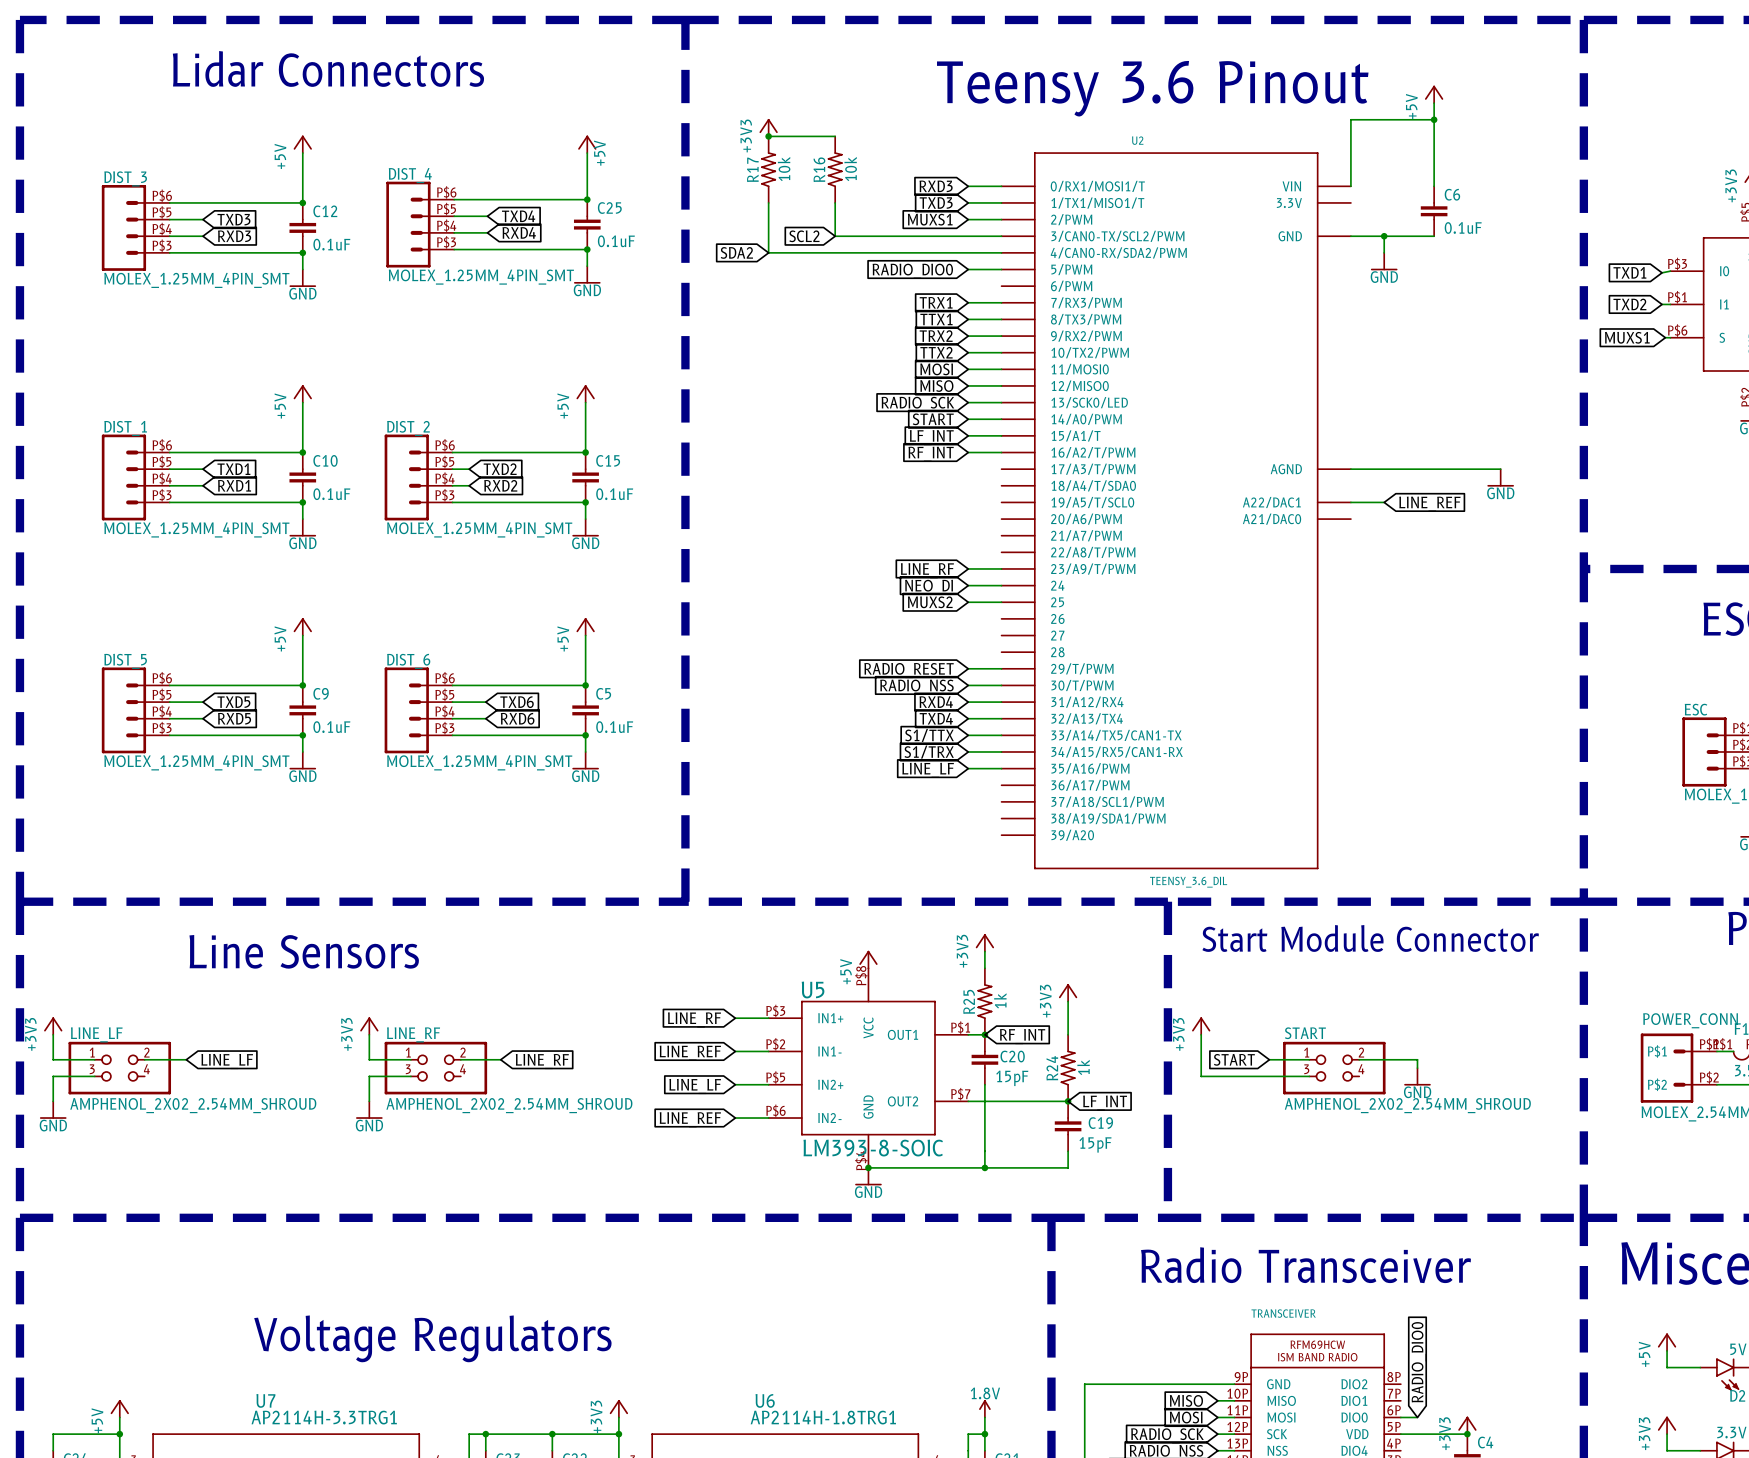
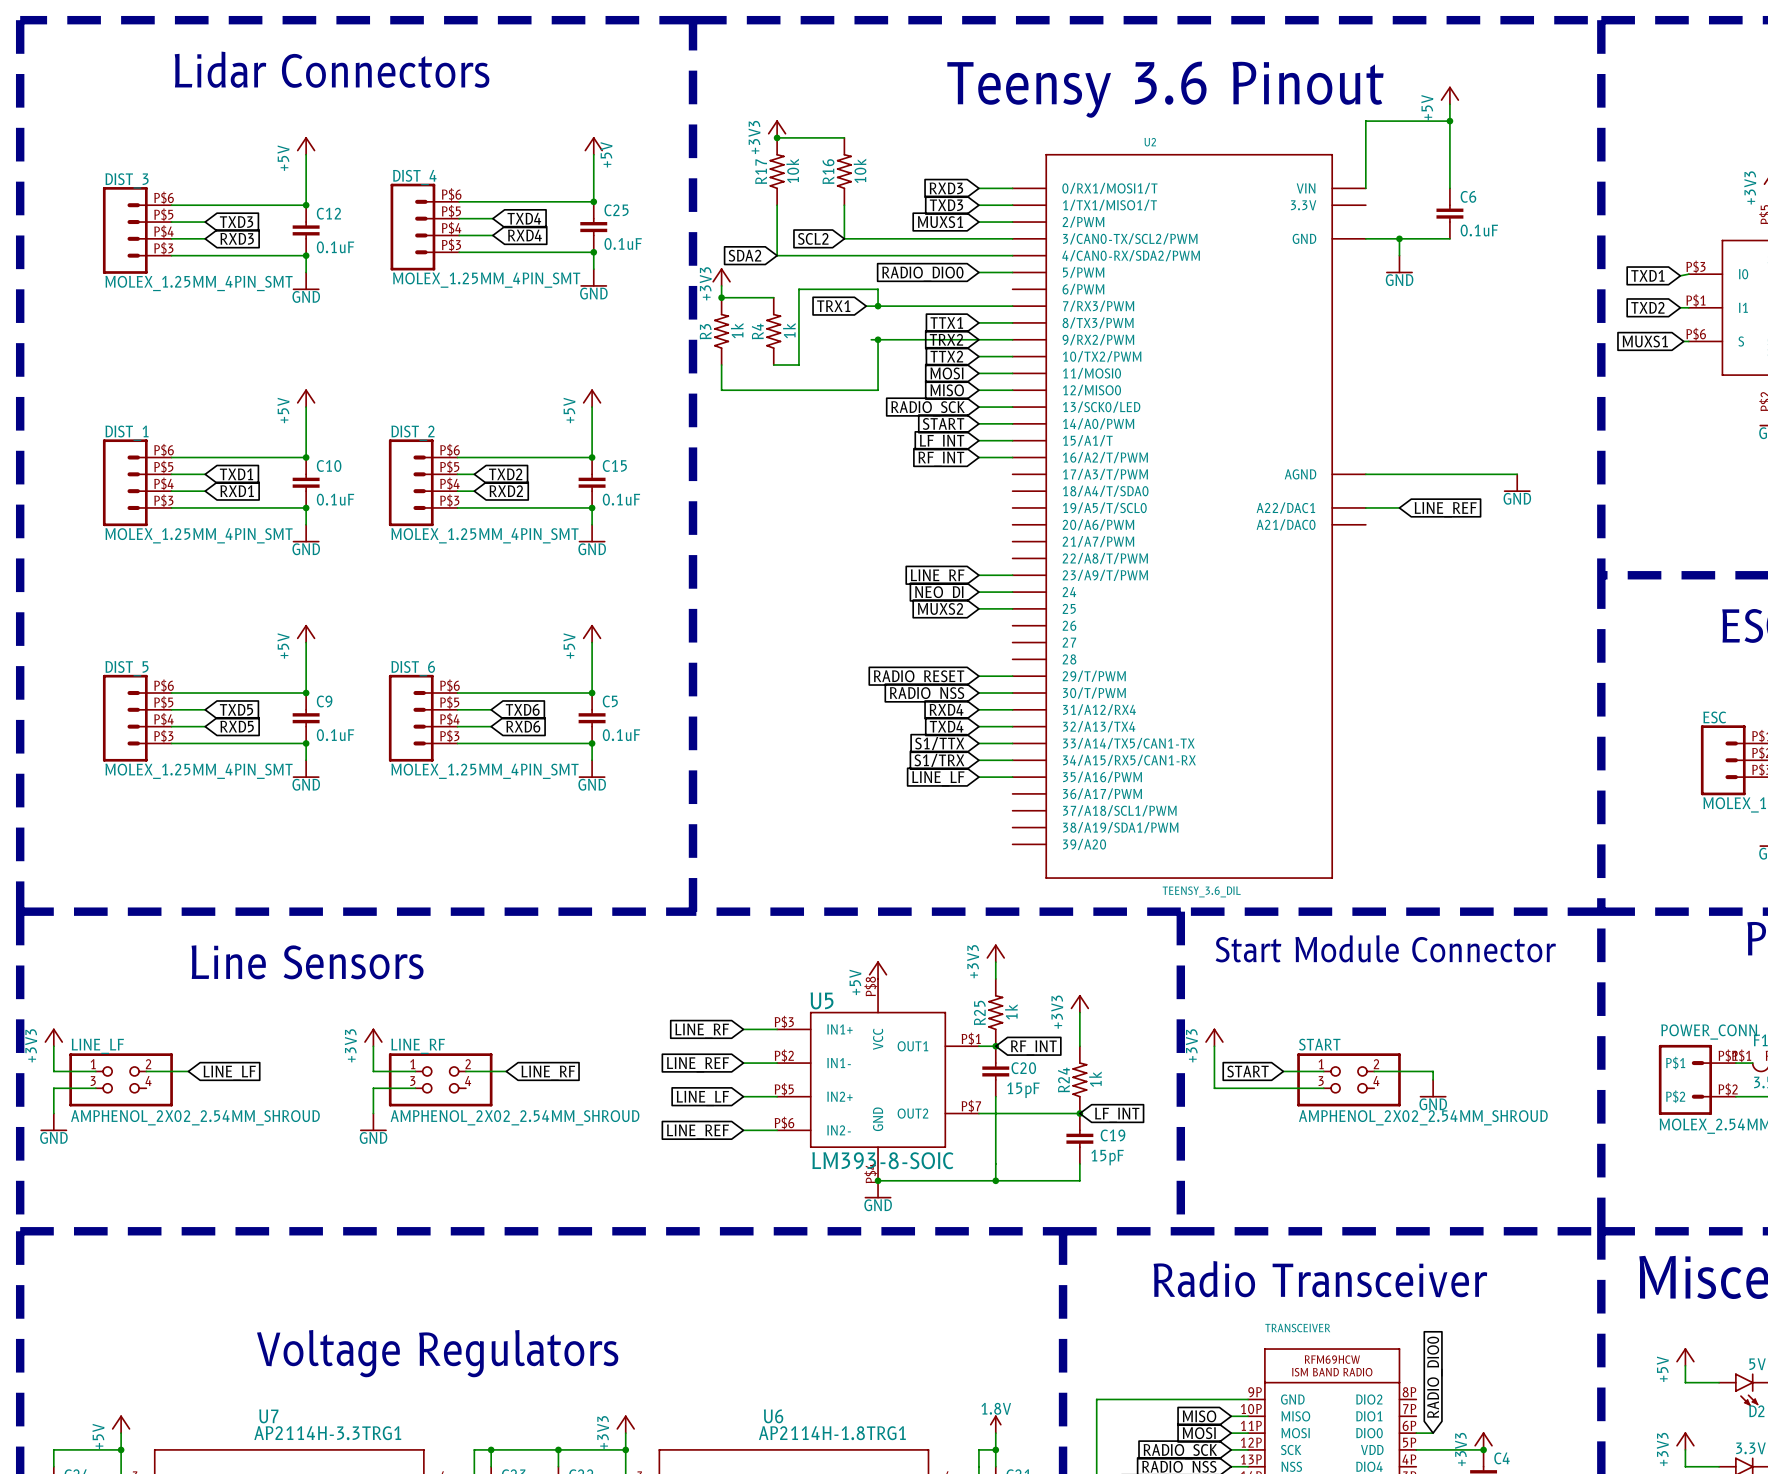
power symbol: none -> +3V3 (721, 277)
wire: none -> (721, 285) (721, 297) (773, 297)
junction: none -> (721, 297)
wire: none -> (866, 306) (978, 306)
wire: none -> (878, 306) (878, 289) (798, 289) (798, 365) (773, 365)
junction: none -> (878, 306)
global label position: TRX1 (936, 302) -> TRX1 (833, 306)
R3: none -> 1k (721, 331)
R4: none -> 1k (773, 331)
wire: none -> (871, 339) (978, 339)
wire: none -> (878, 339) (878, 390) (721, 390) (721, 365)
junction: none -> (878, 339)

